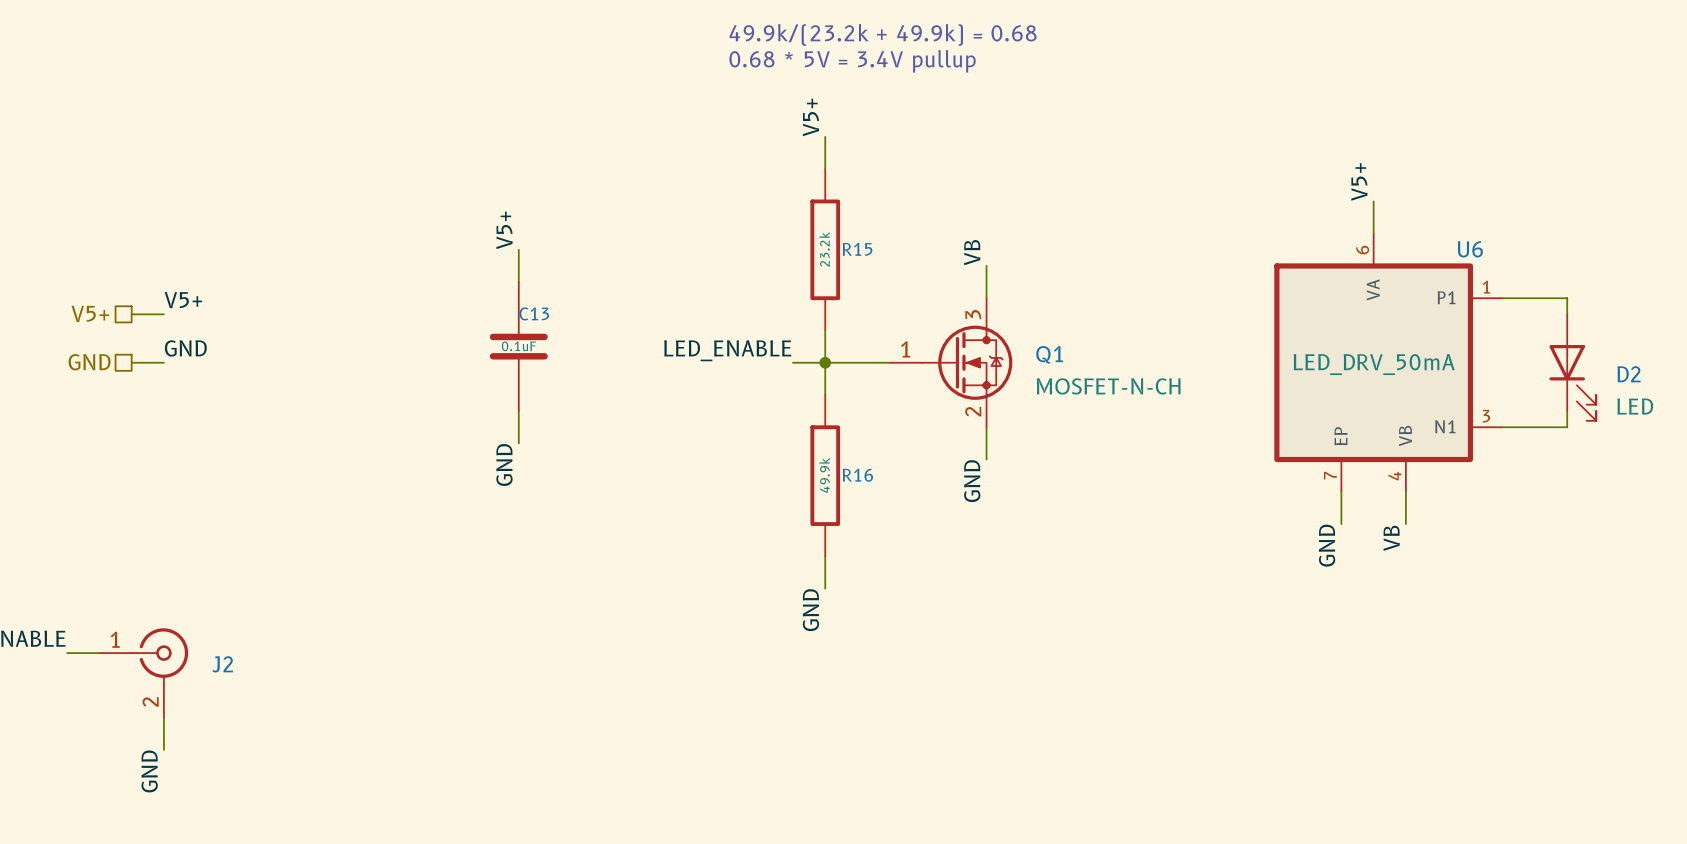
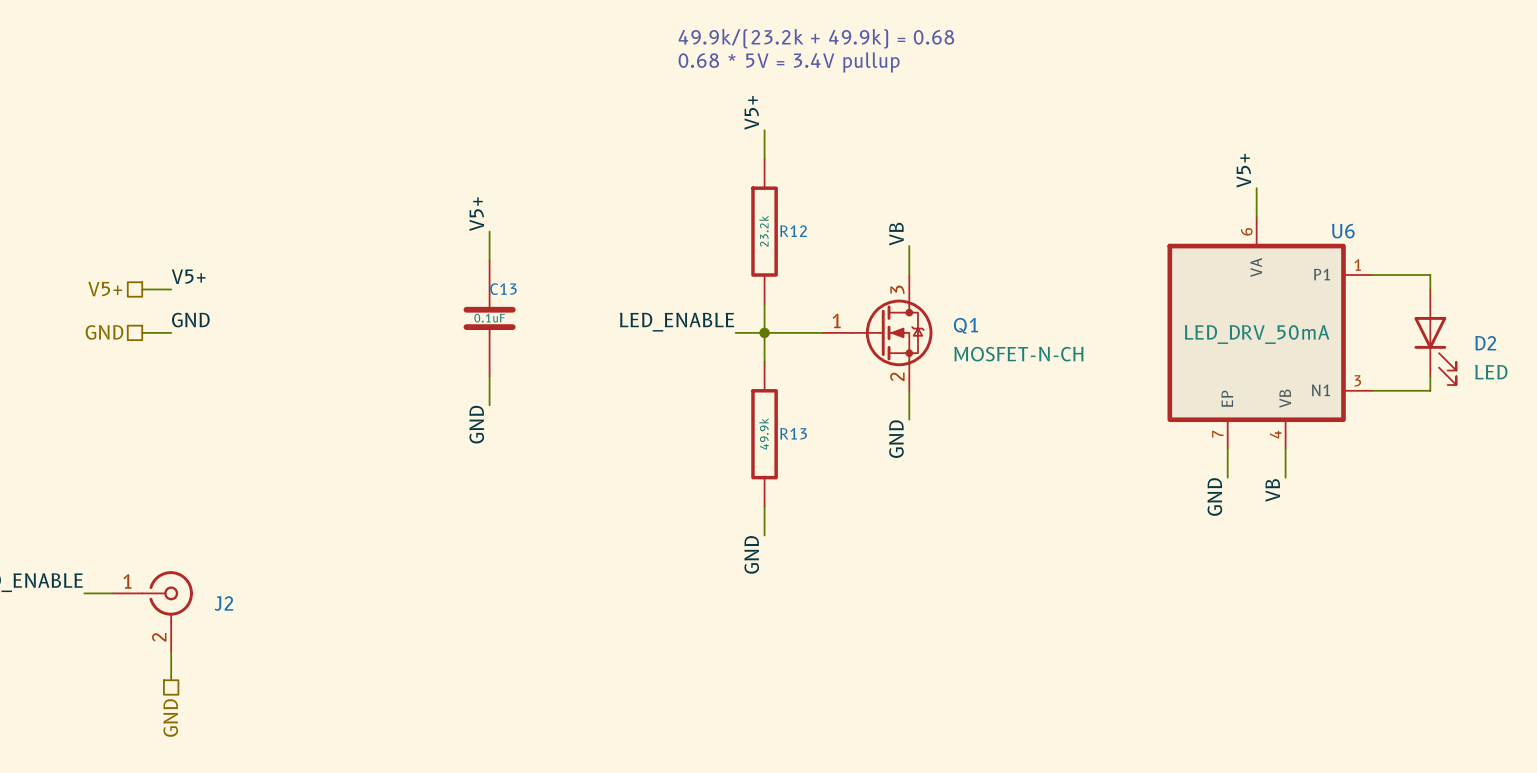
R15 name: R15 (857, 249) -> R12 (793, 231)
R16 name: R16 (857, 475) -> R13 (793, 433)
label: GND (149, 771) -> none
hierarchical label: none -> GND (170, 718)

